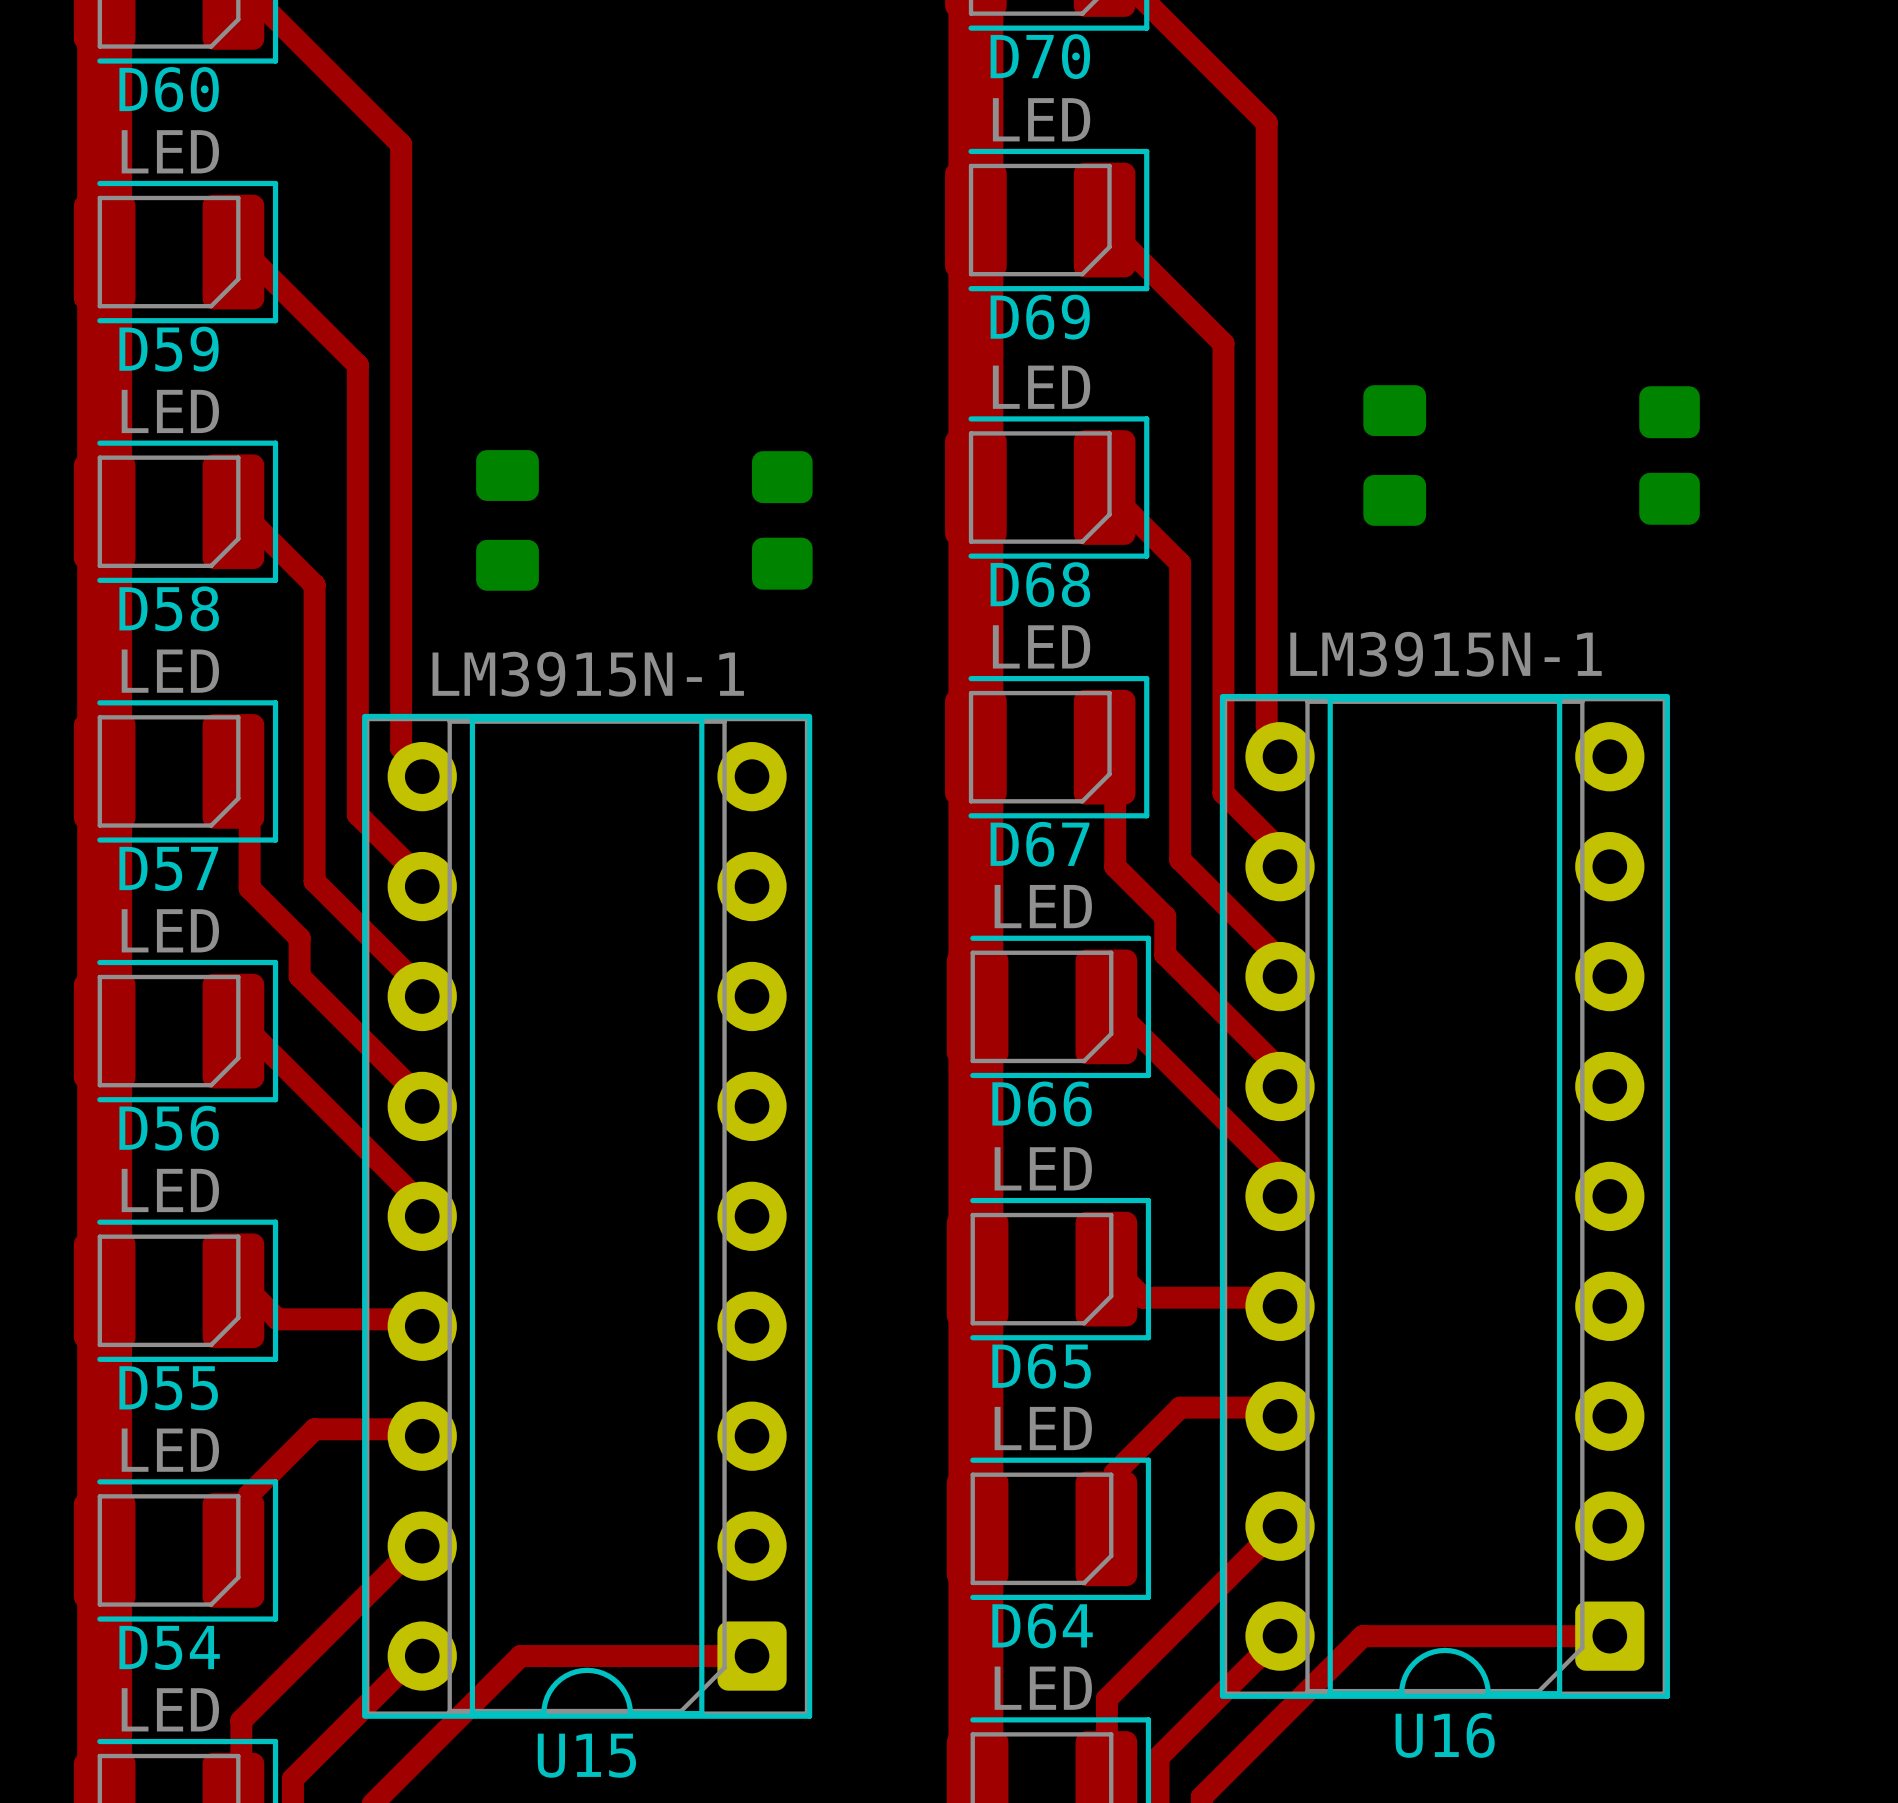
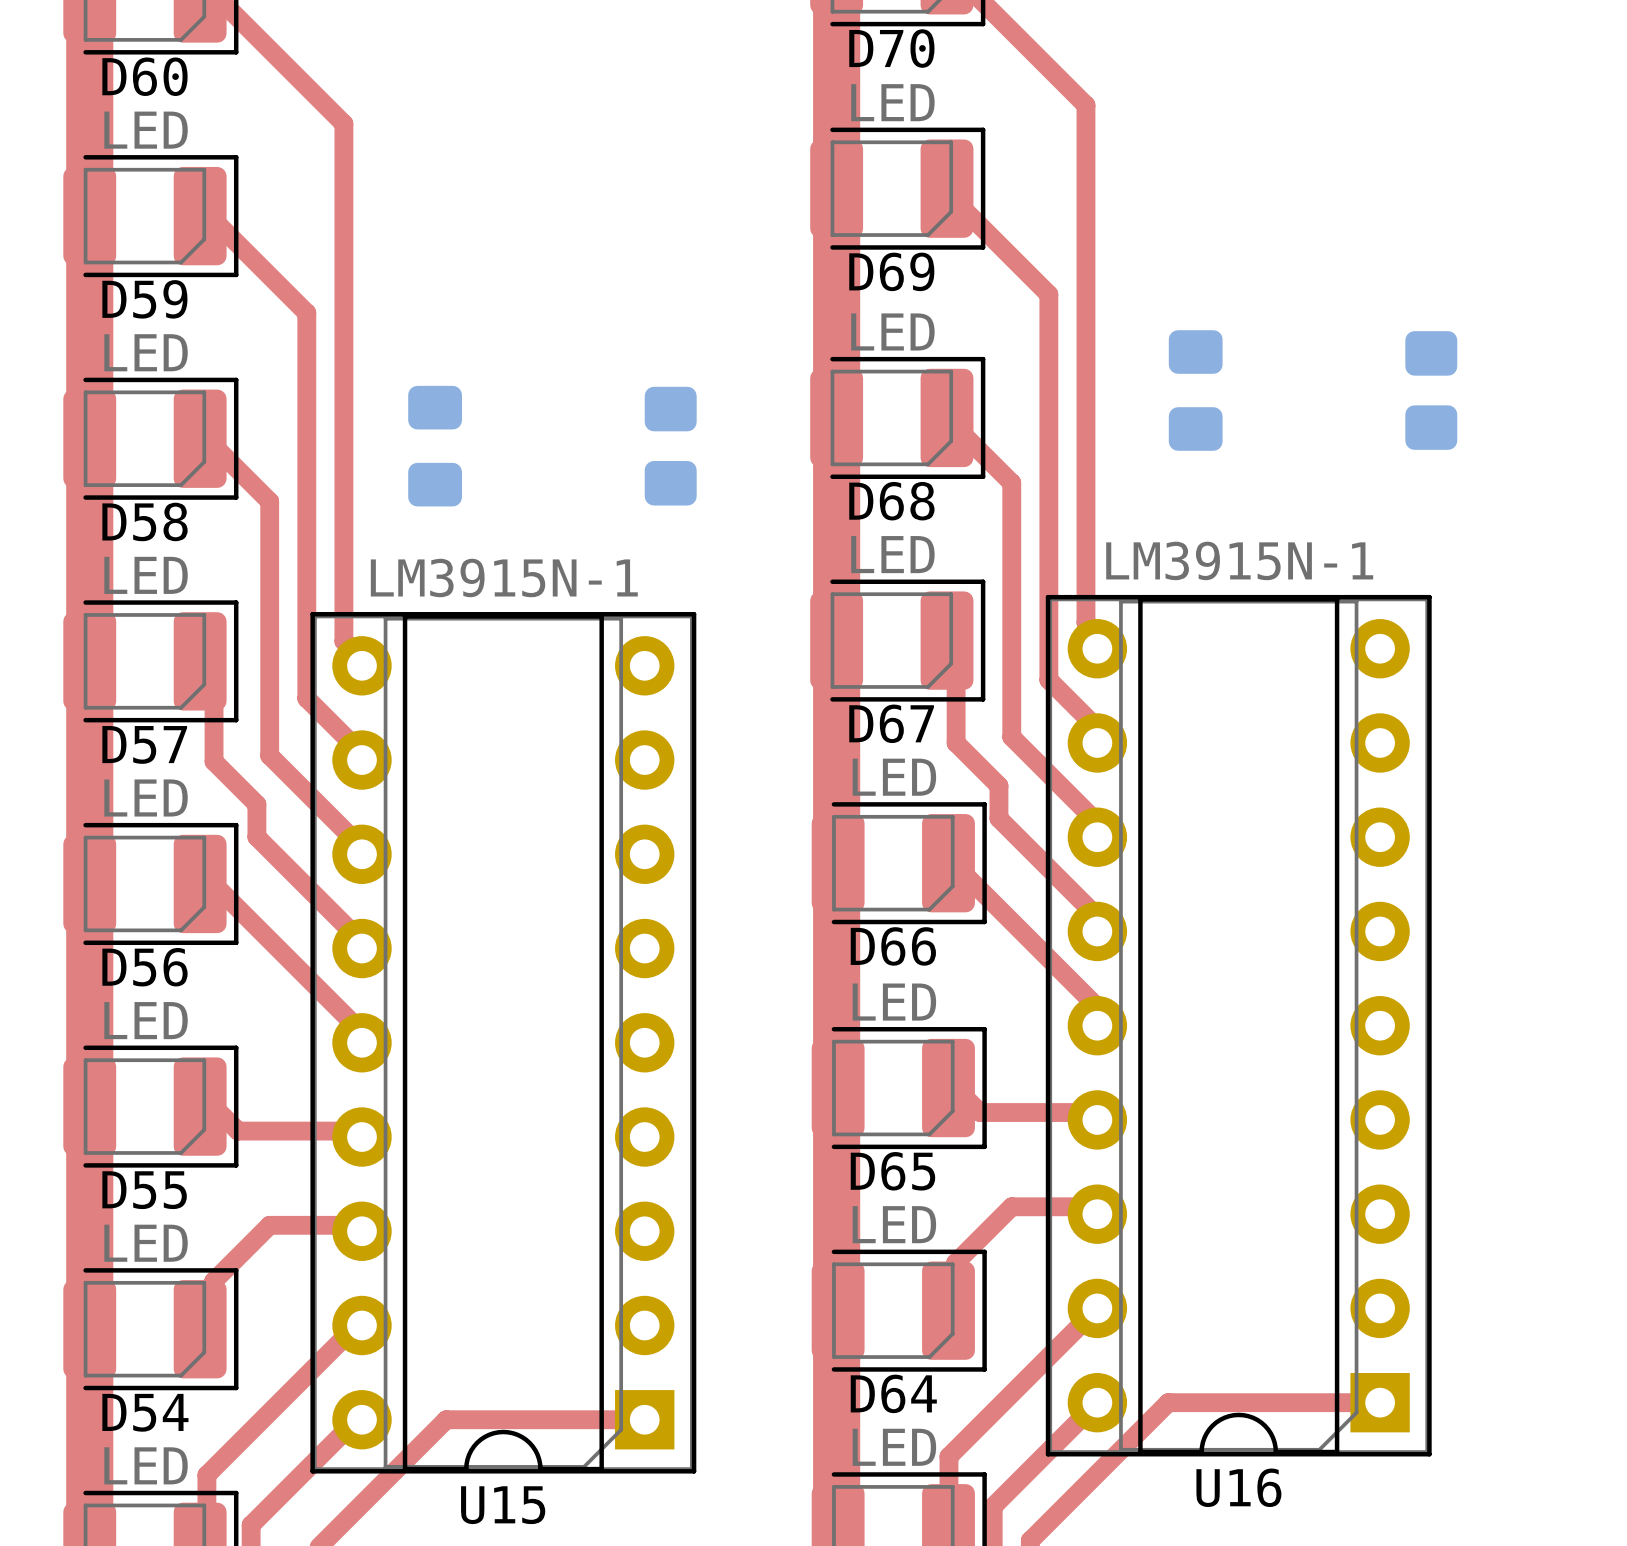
U16 footprint: [1219, 693, 1670, 1699] -> [1045, 594, 1432, 1457]
U15 footprint: [362, 713, 813, 1719] -> [310, 612, 697, 1474]

